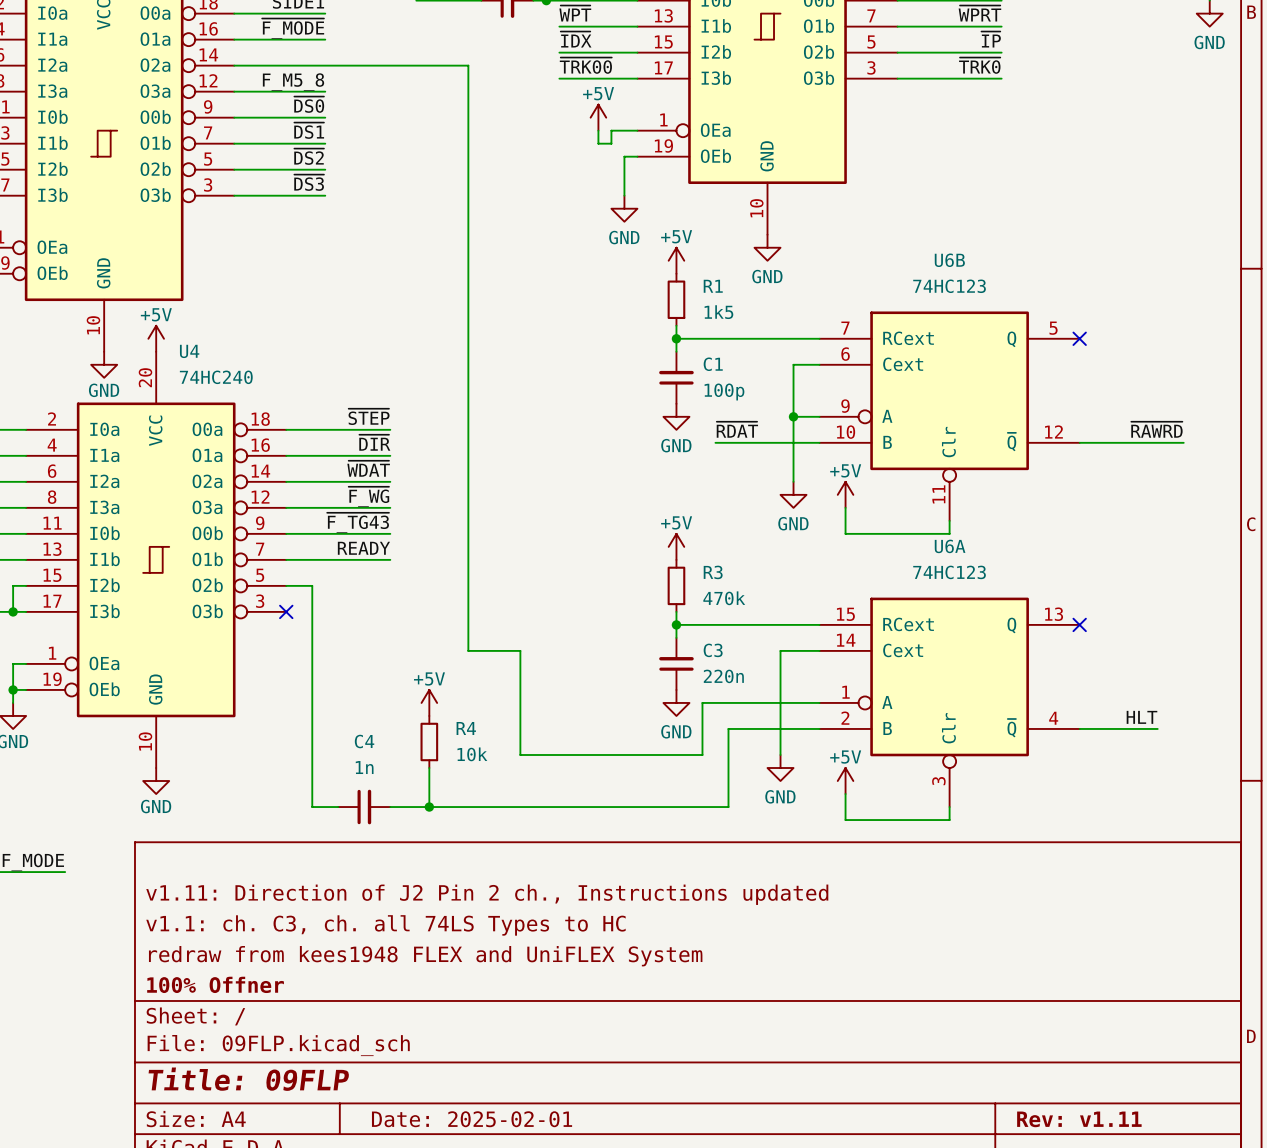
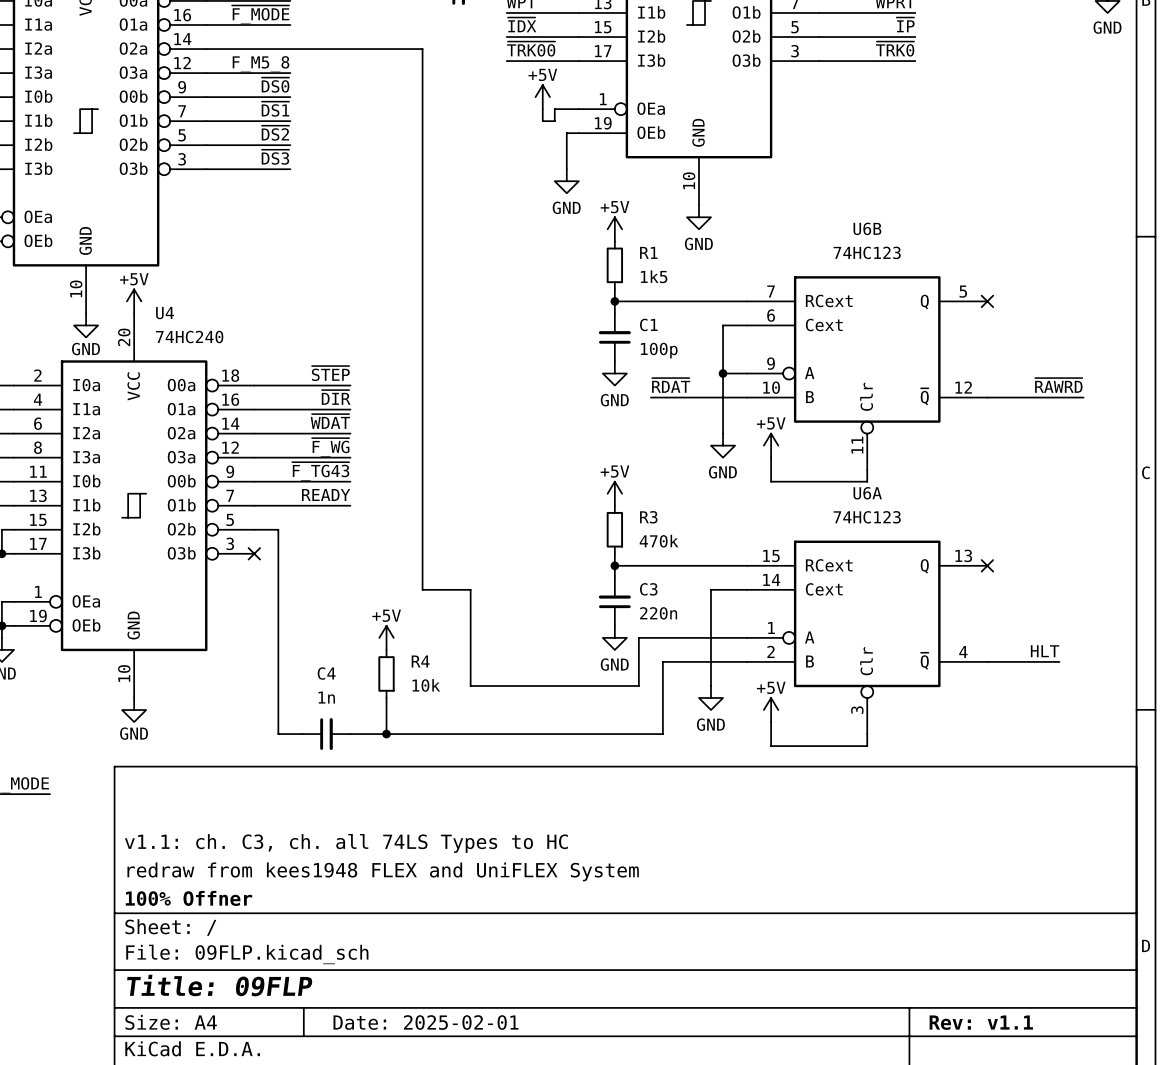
title block: v1.11: Direction of J2 Pin 2 ch., Instructions updated (487, 894) -> none
title block: Rev: v1.11 (1079, 1119) -> Rev: v1.1 (981, 1022)

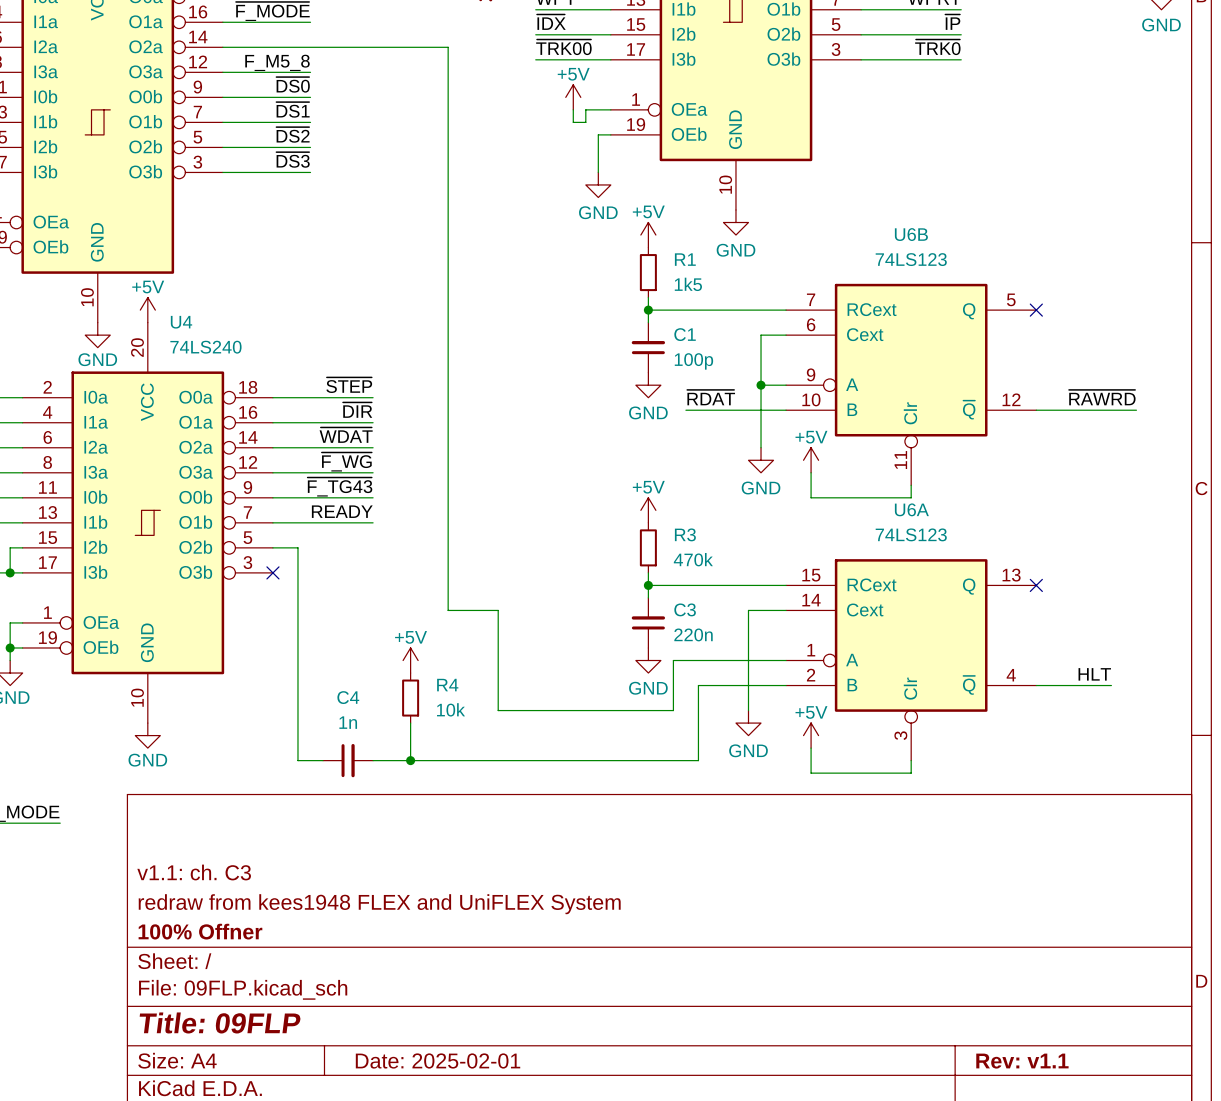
U6B value: 74HC123 (867, 252) -> 74LS123 (911, 259)
U4 value: 74HC240 (189, 337) -> 74LS240 (205, 347)
U6A value: 74HC123 (867, 517) -> 74LS123 (911, 534)
title block: v1.1: ch. C3, ch. all 74LS Types to HC (346, 843) -> v1.1: ch. C3 (194, 872)

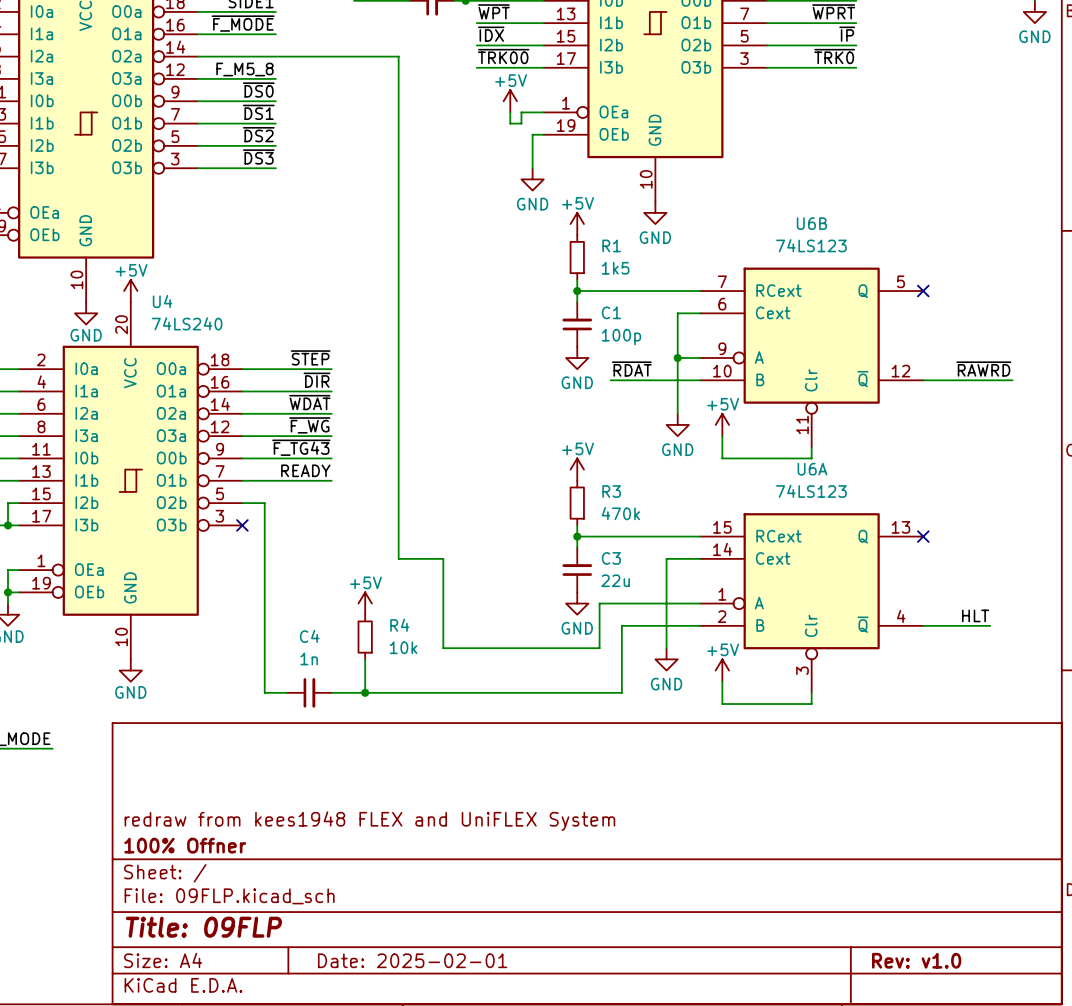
C3 value: 220n (693, 634) -> 22u (615, 580)
title block: v1.1: ch. C3 (194, 872) -> none
title block: Rev: v1.1 (1022, 1061) -> Rev: v1.0 (916, 960)

